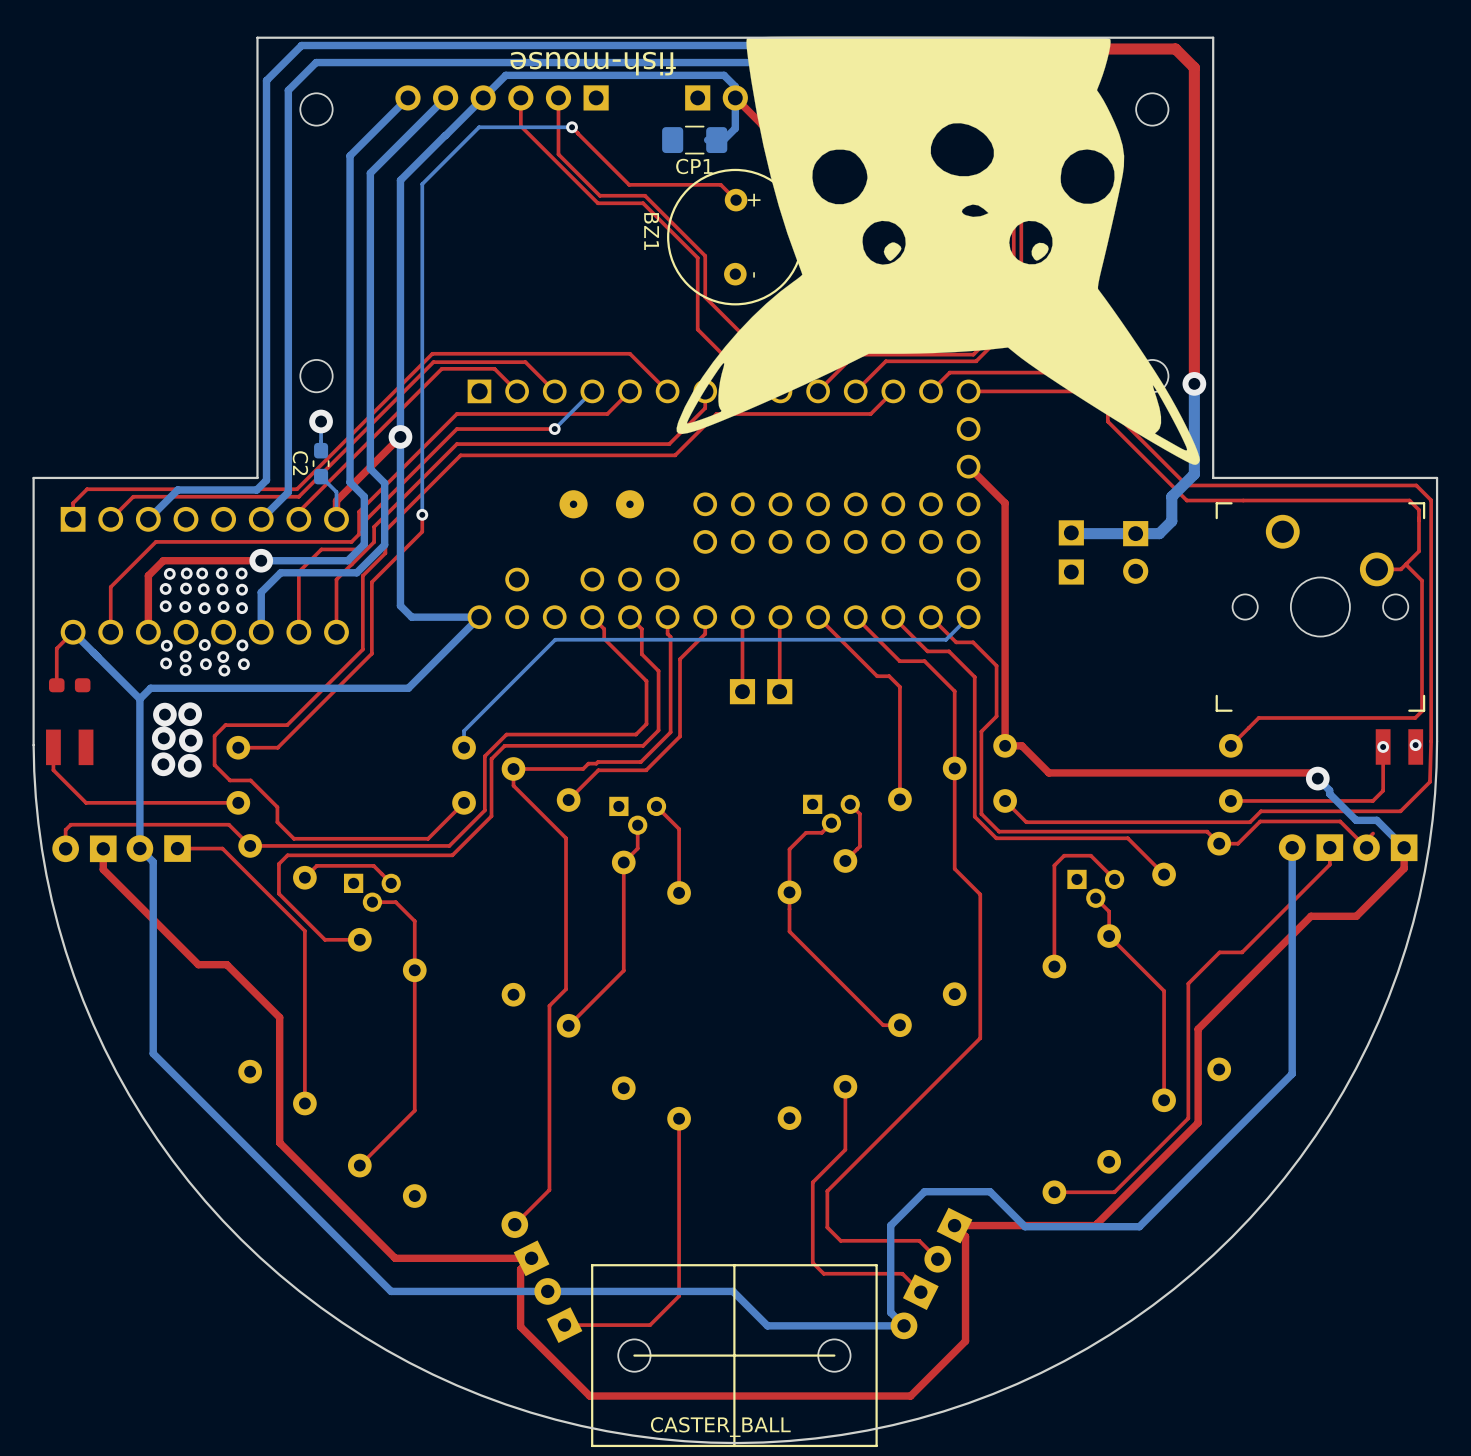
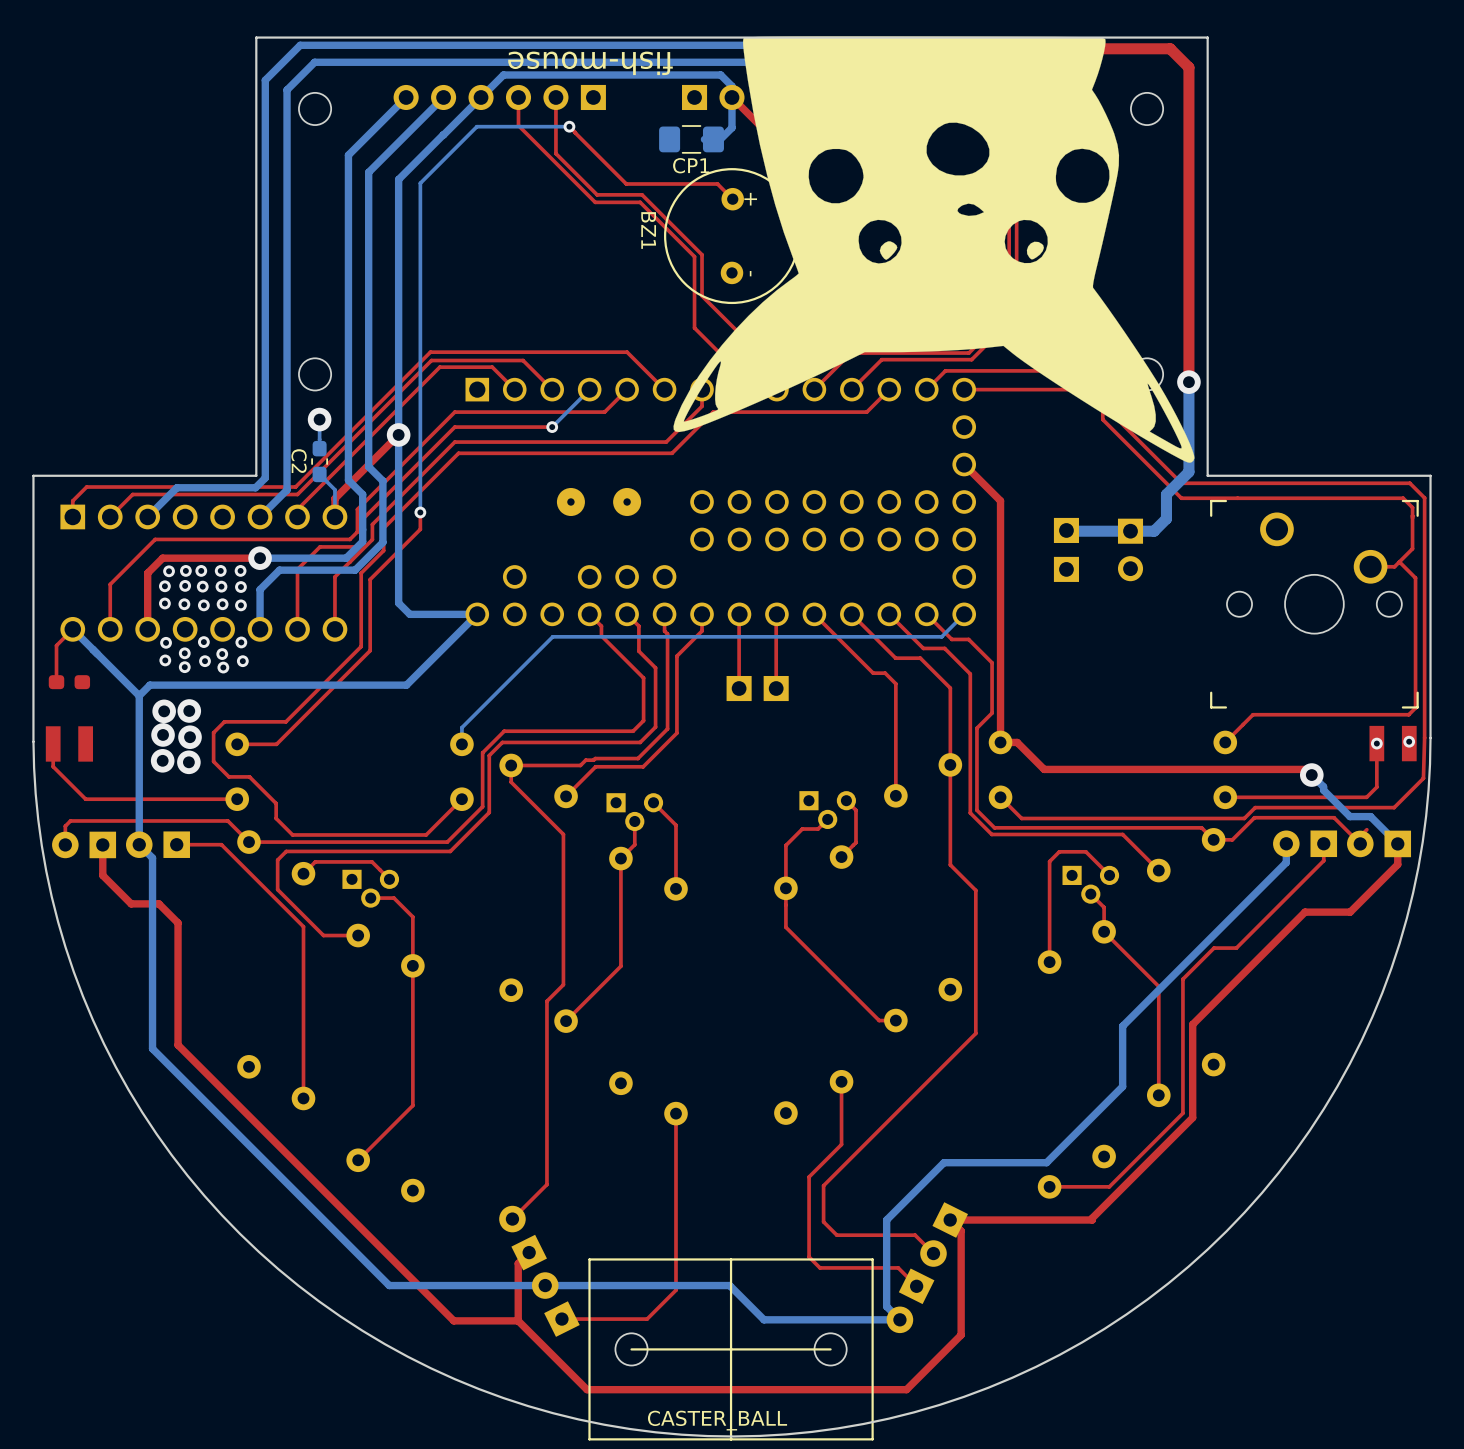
bottom track: (1292, 866) (1292, 1073) (1139, 1226) (1025, 1226) (990, 1191) (924, 1191) -> (1286, 862) (1122, 1026) (1122, 1086) (1046, 1162) (943, 1162) (920, 1186)
top track: (103, 869) (198, 964) (226, 964) (279, 1017) (279, 1142) (395, 1258) (531, 1258) -> (102, 865) (102, 875) (131, 903) (158, 903) (178, 922) (178, 1045) (453, 1320) (518, 1320)

